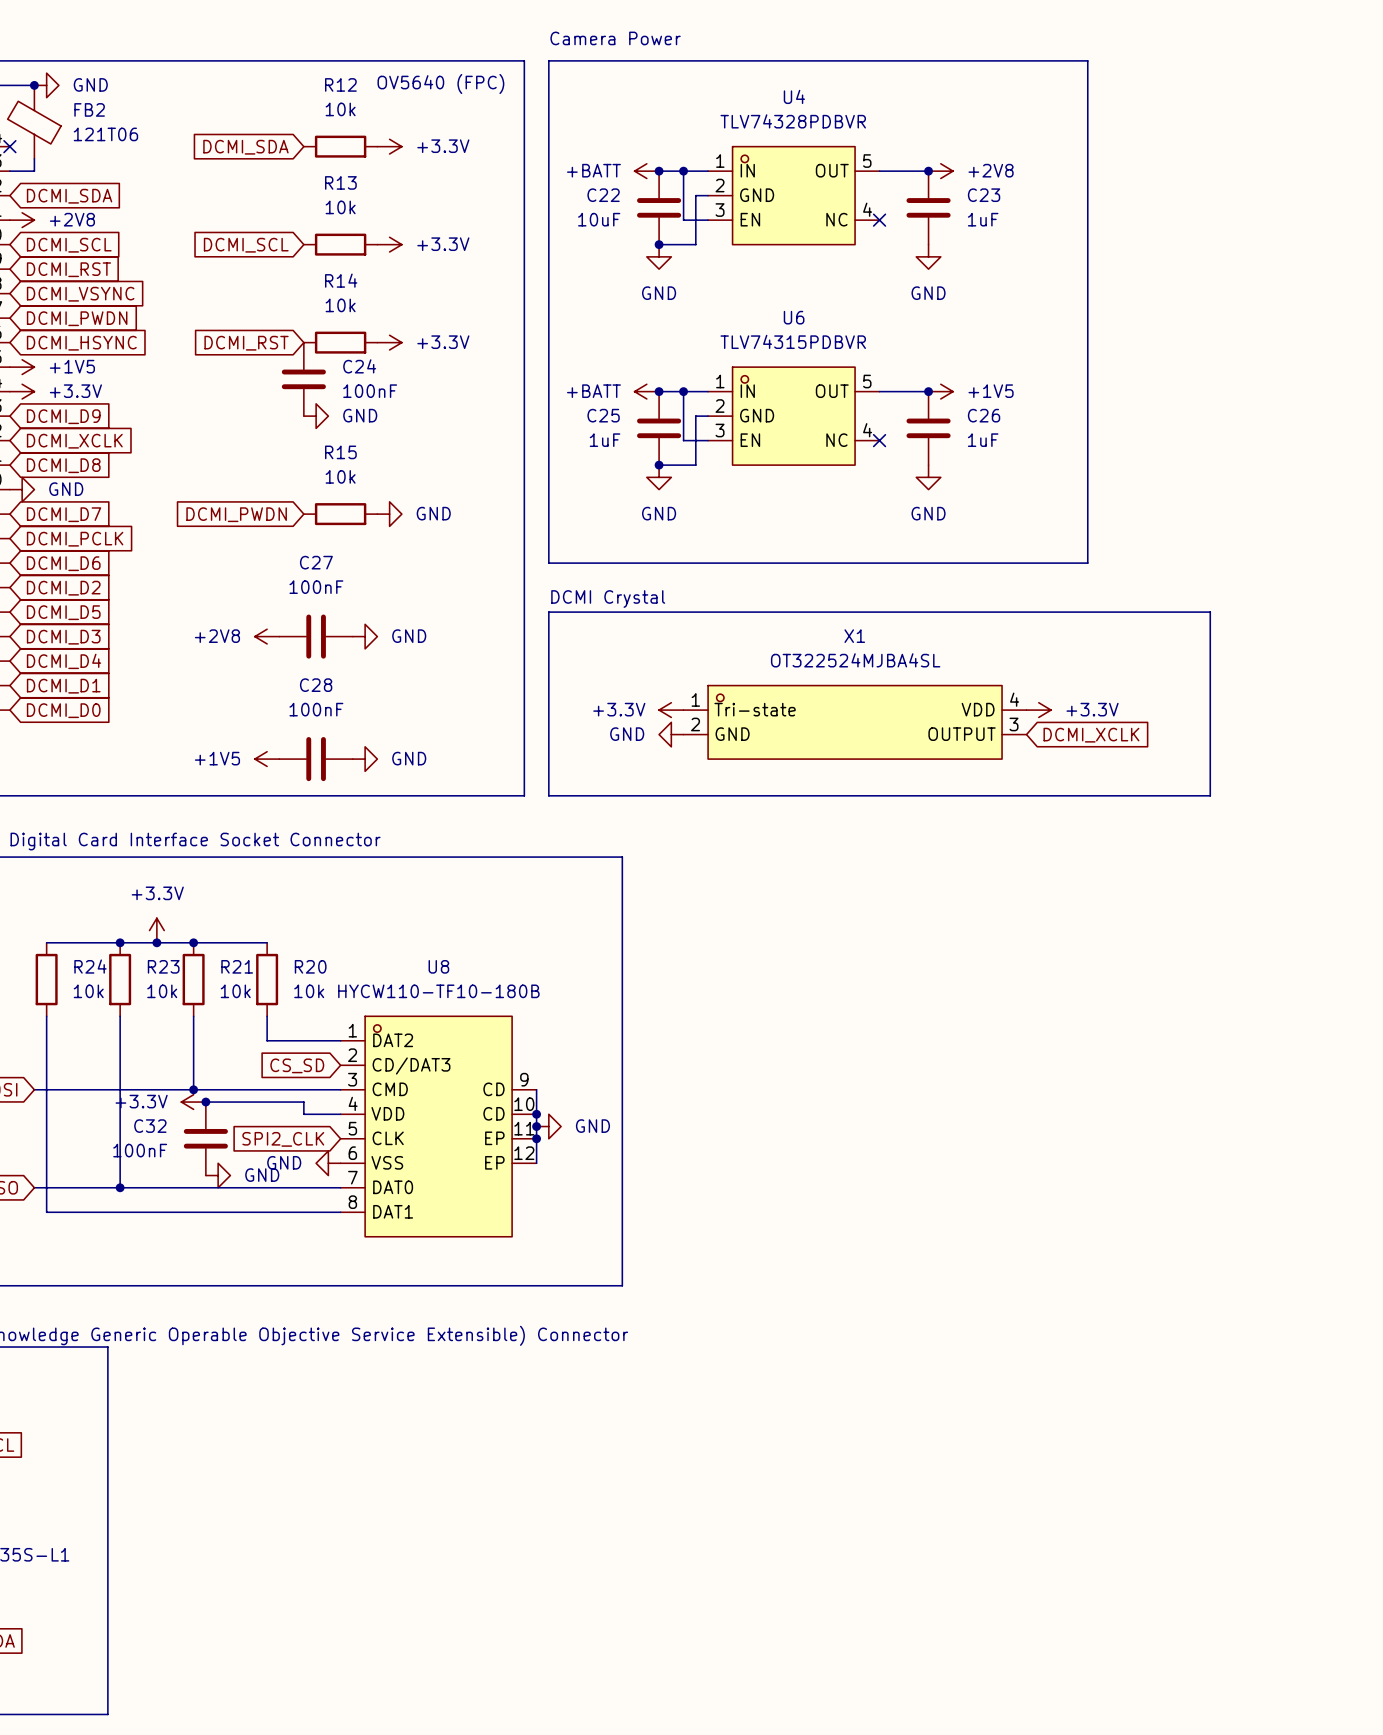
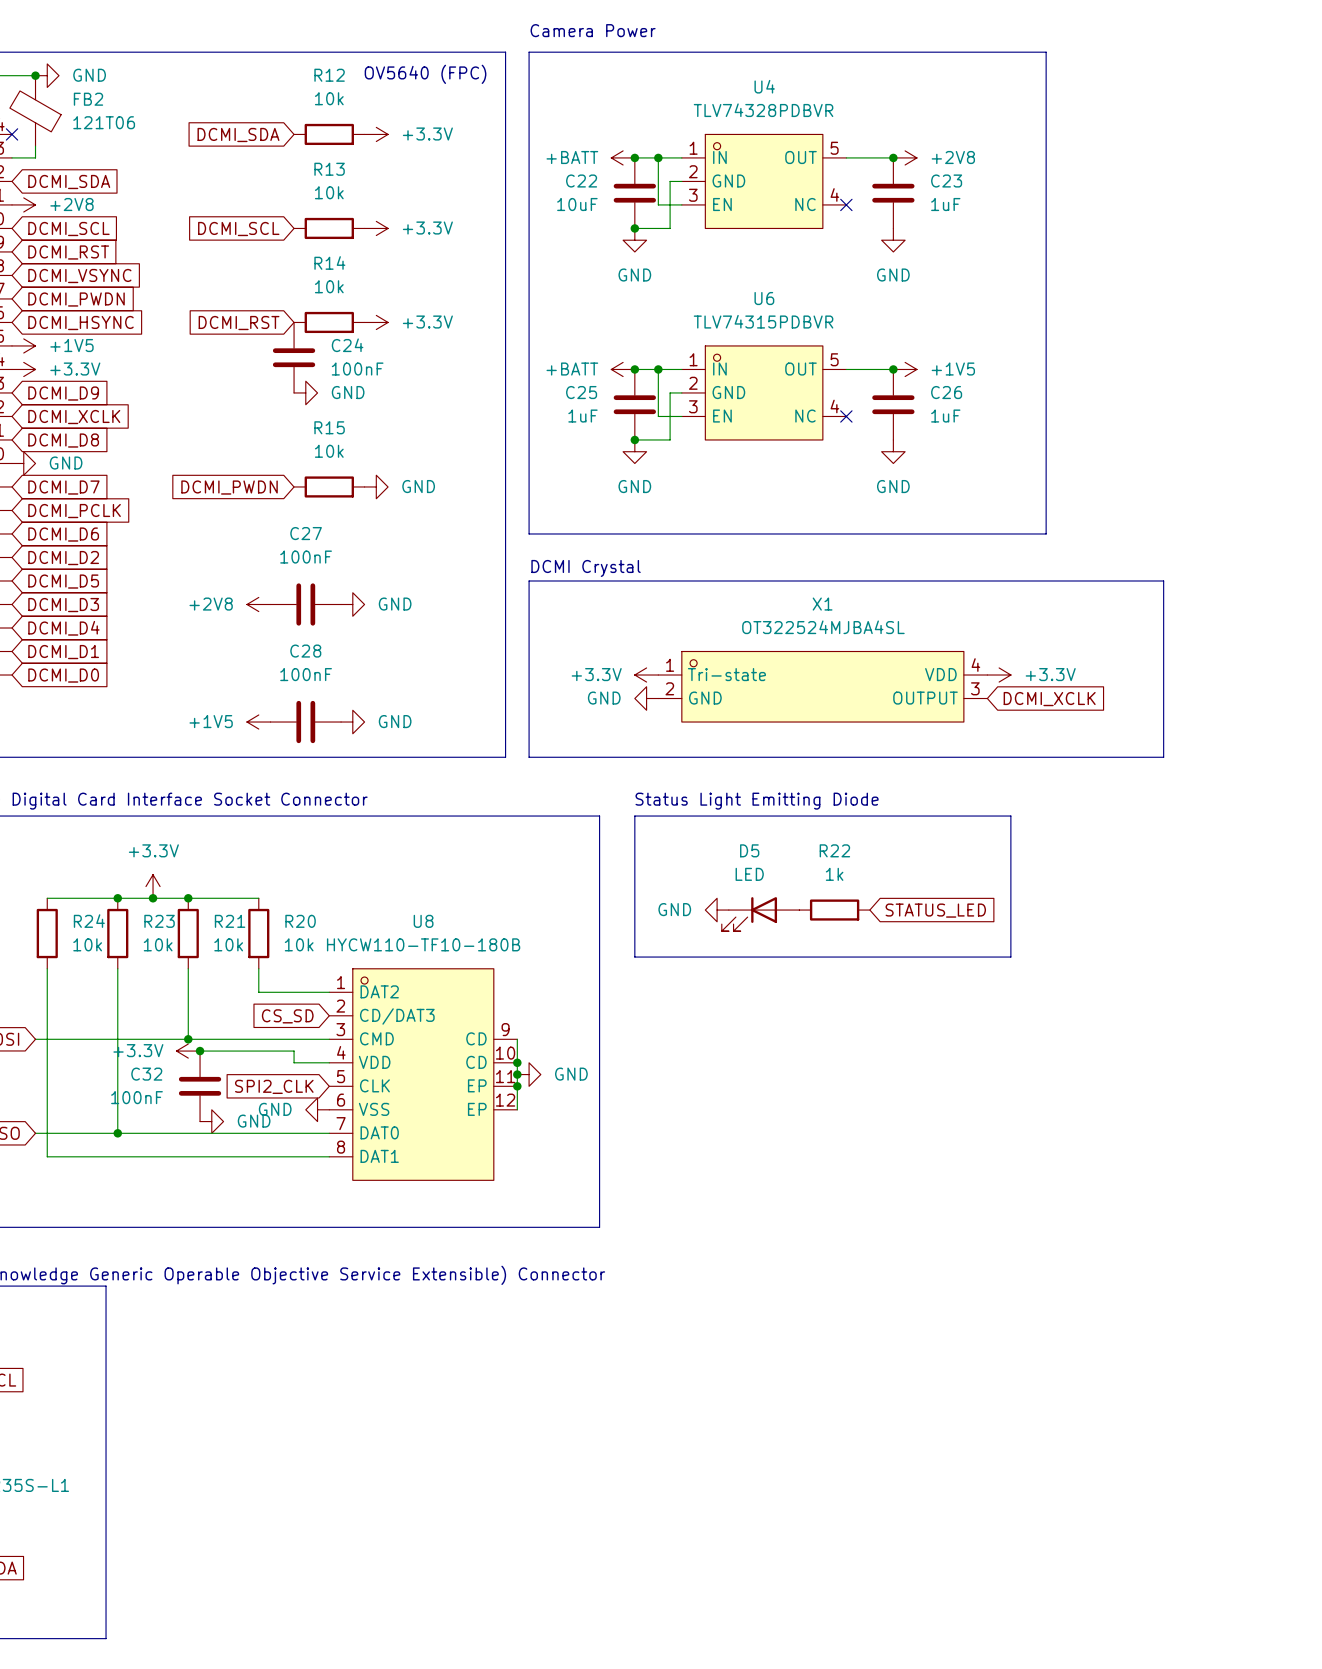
text: none -> Status Light Emitting Diode (757, 801)
line: none -> (634, 816) (1010, 816) (1010, 957) (634, 957) (634, 816)
power symbol: none -> GND (717, 910)
R22: none -> 1k (834, 910)
global label: none -> STATUS_LED (935, 910)
D5: none -> LED (760, 914)

